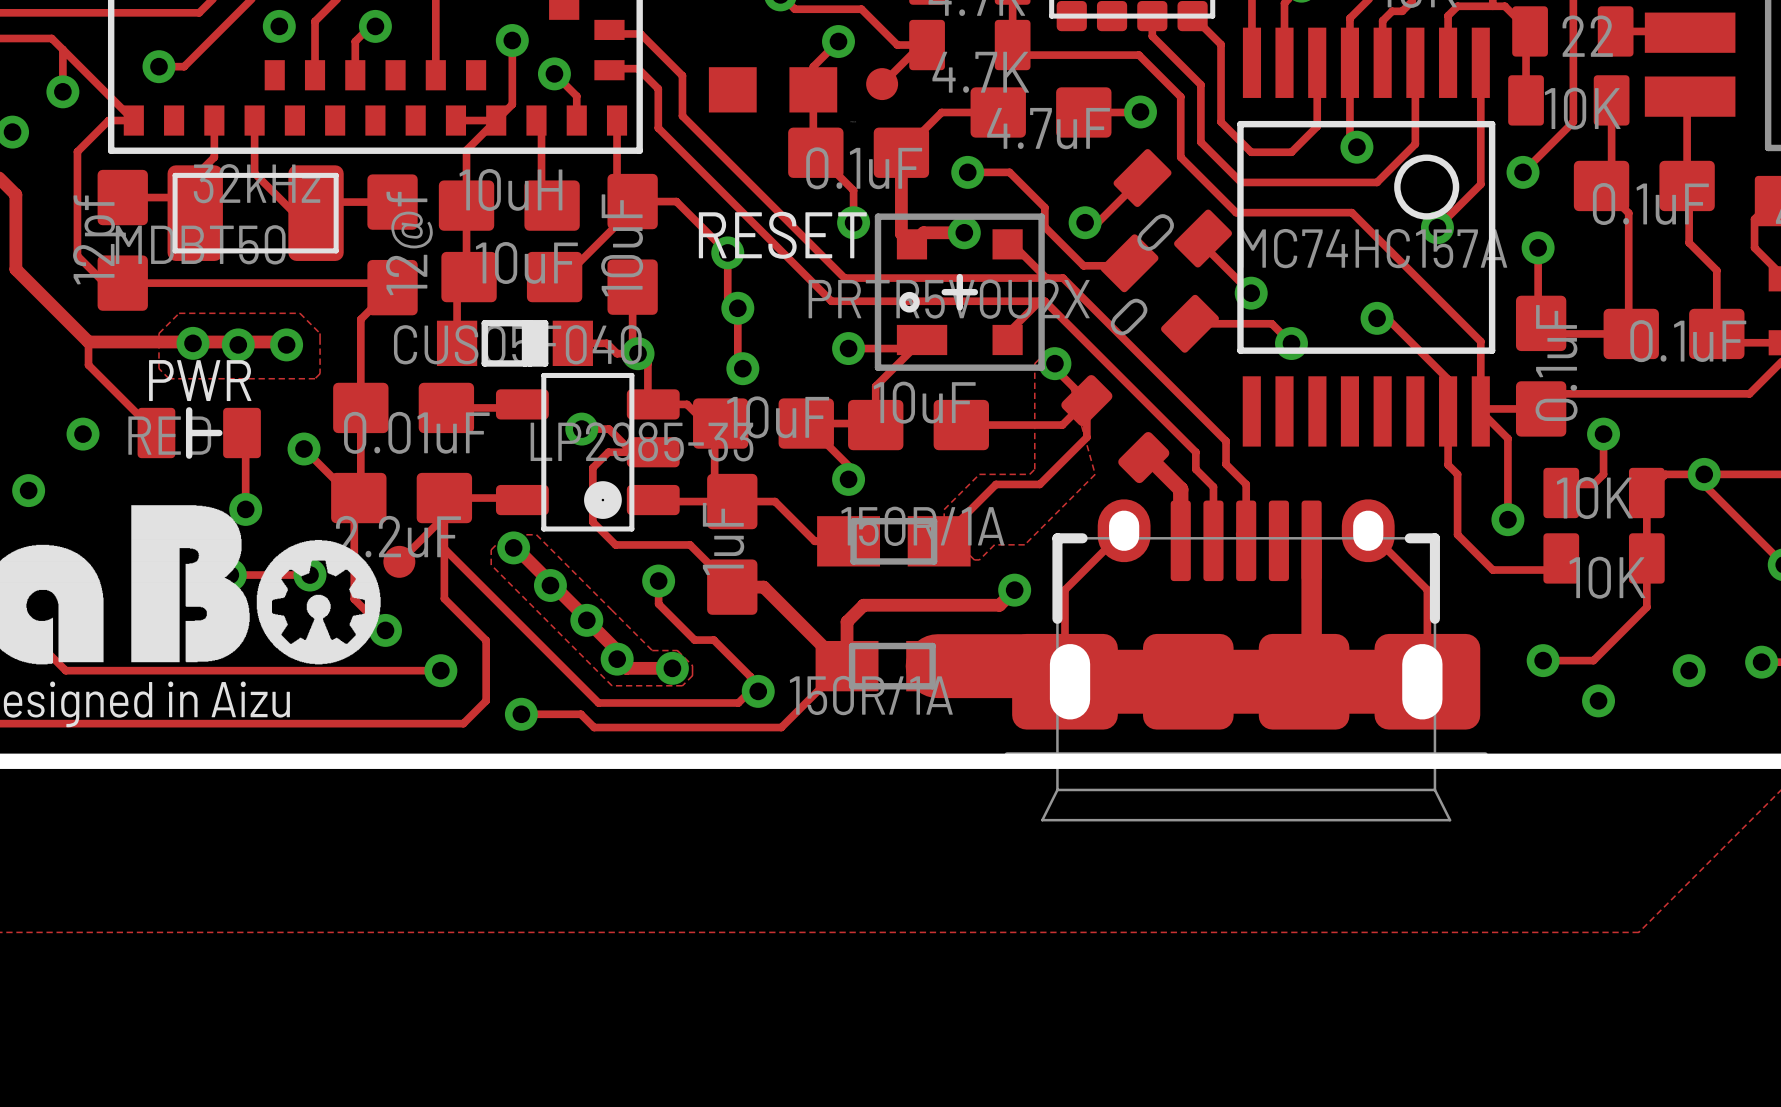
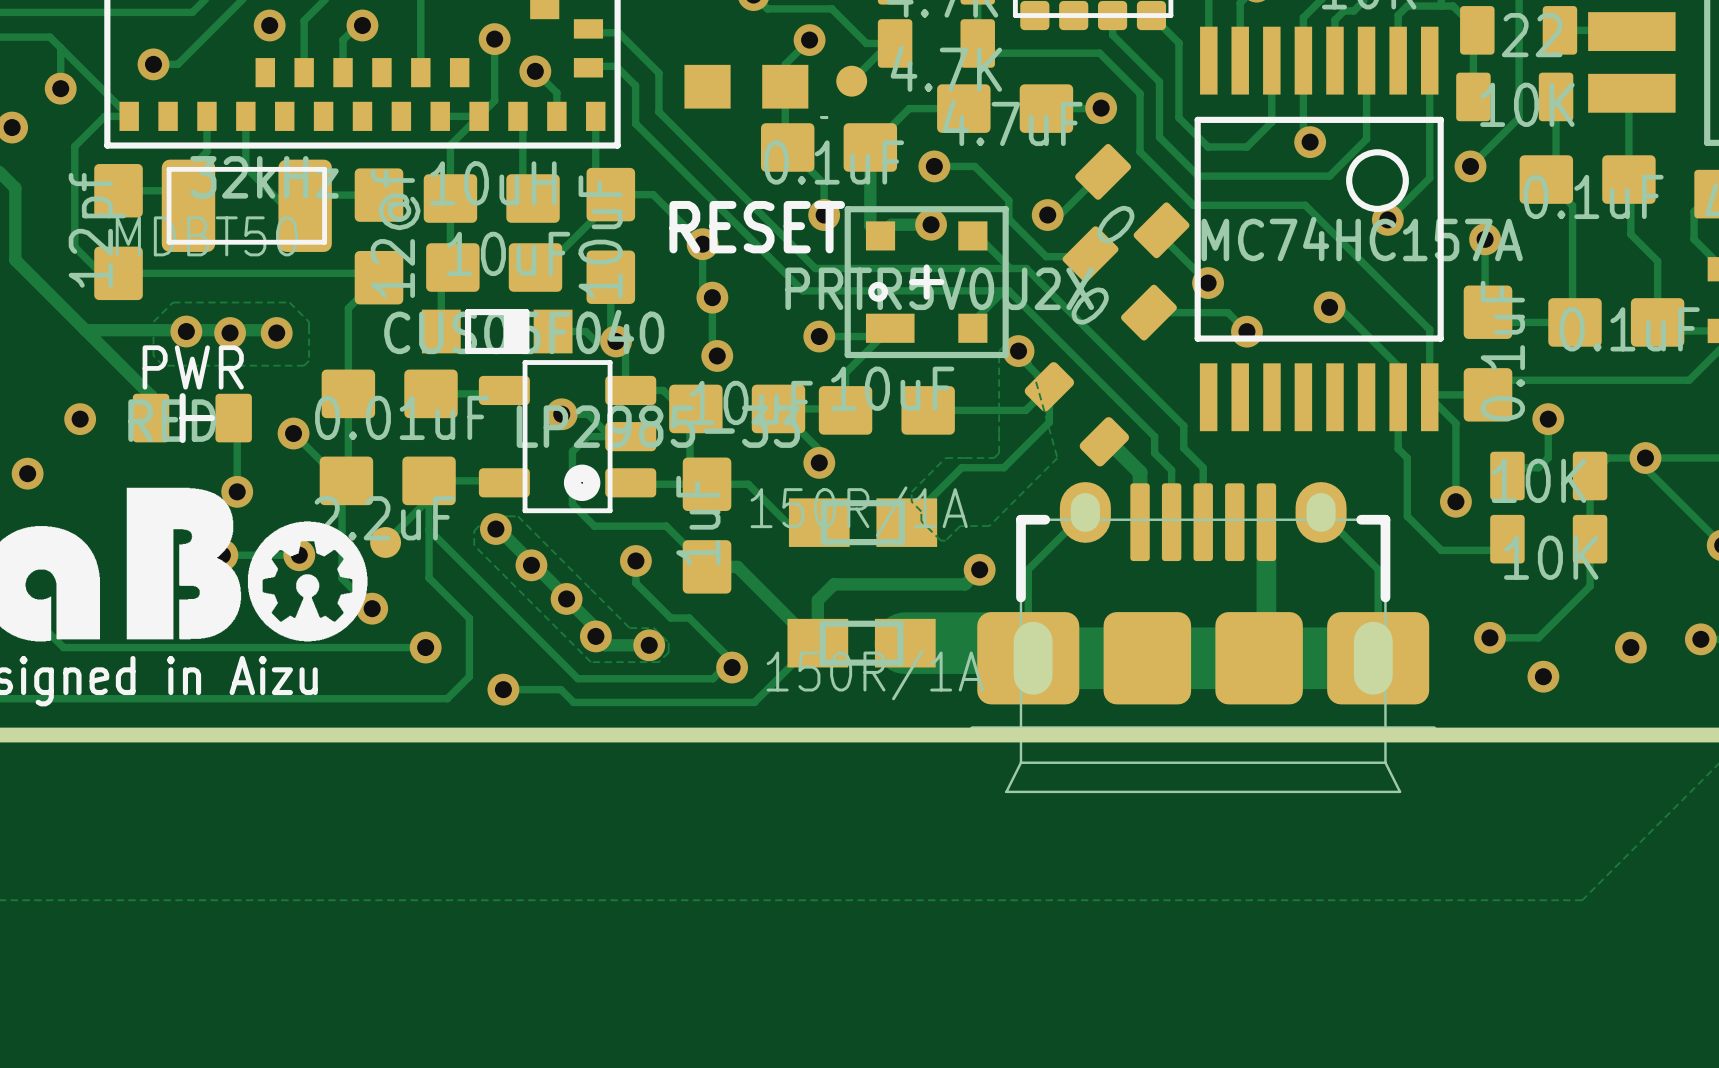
track: (88, 342) (88, 365) (156, 433) -> (85, 330) (151, 395) (151, 418)

